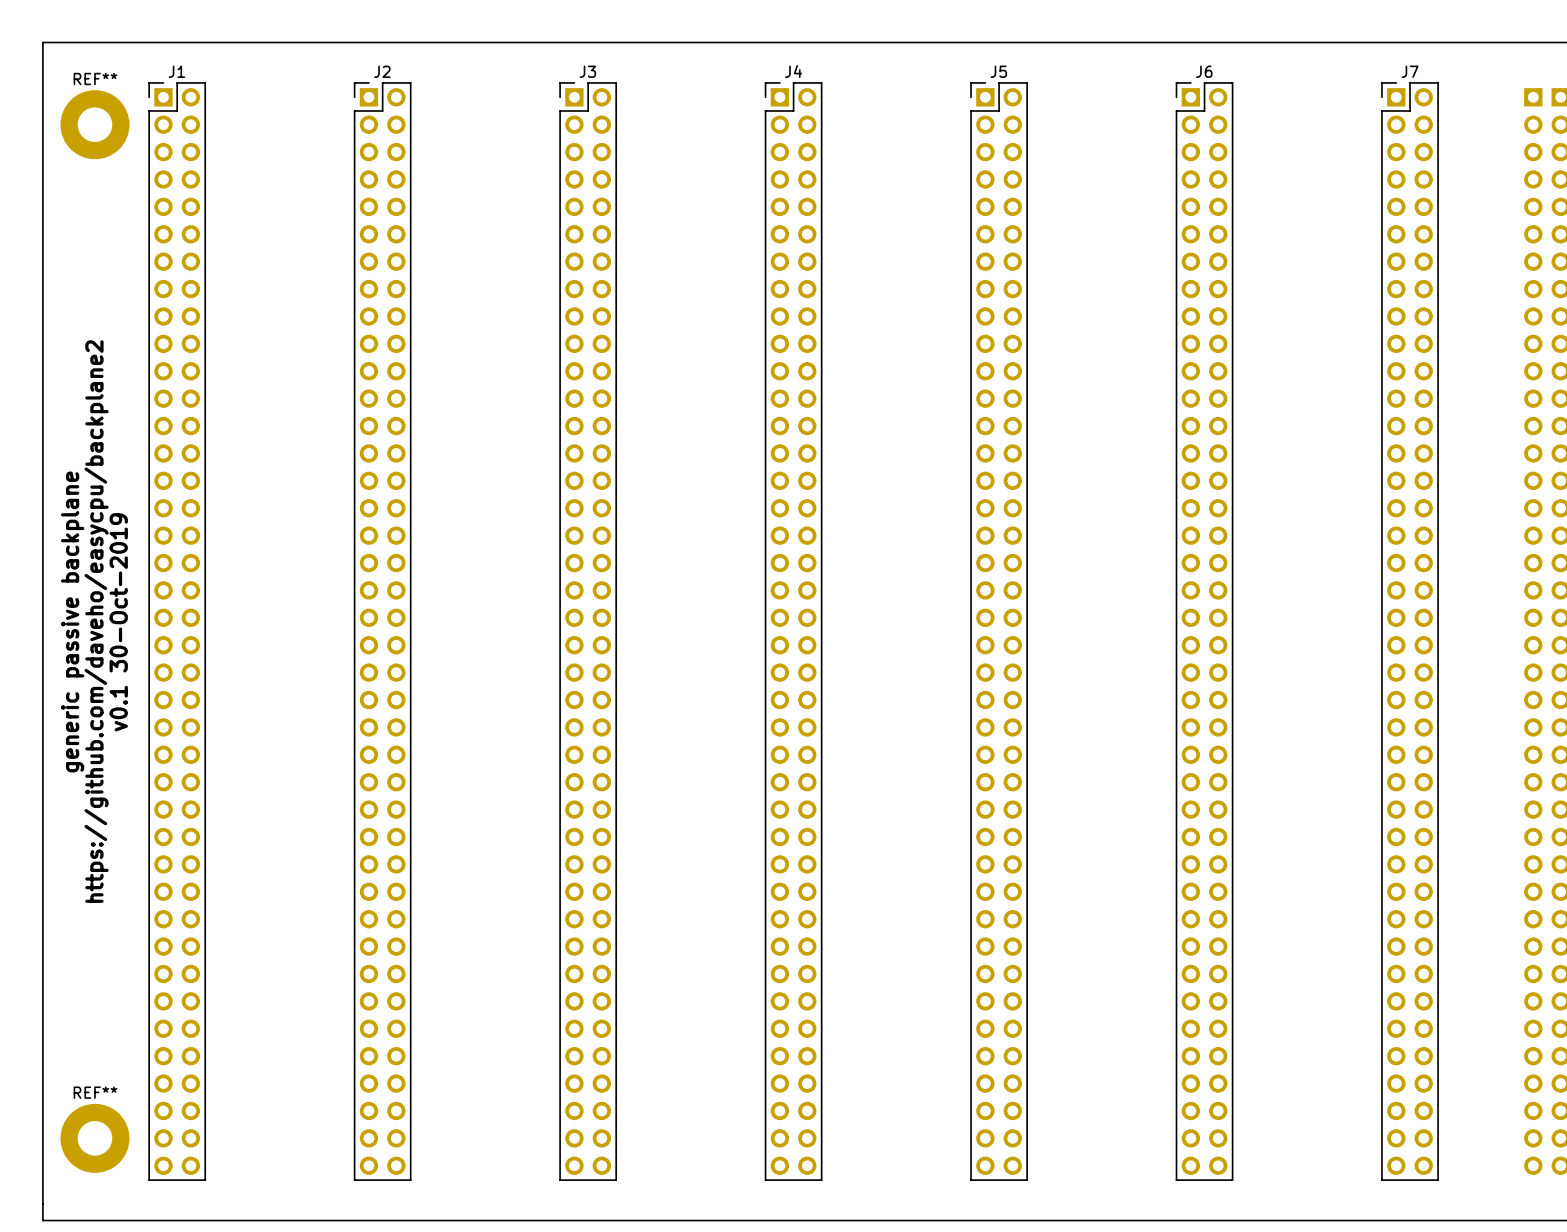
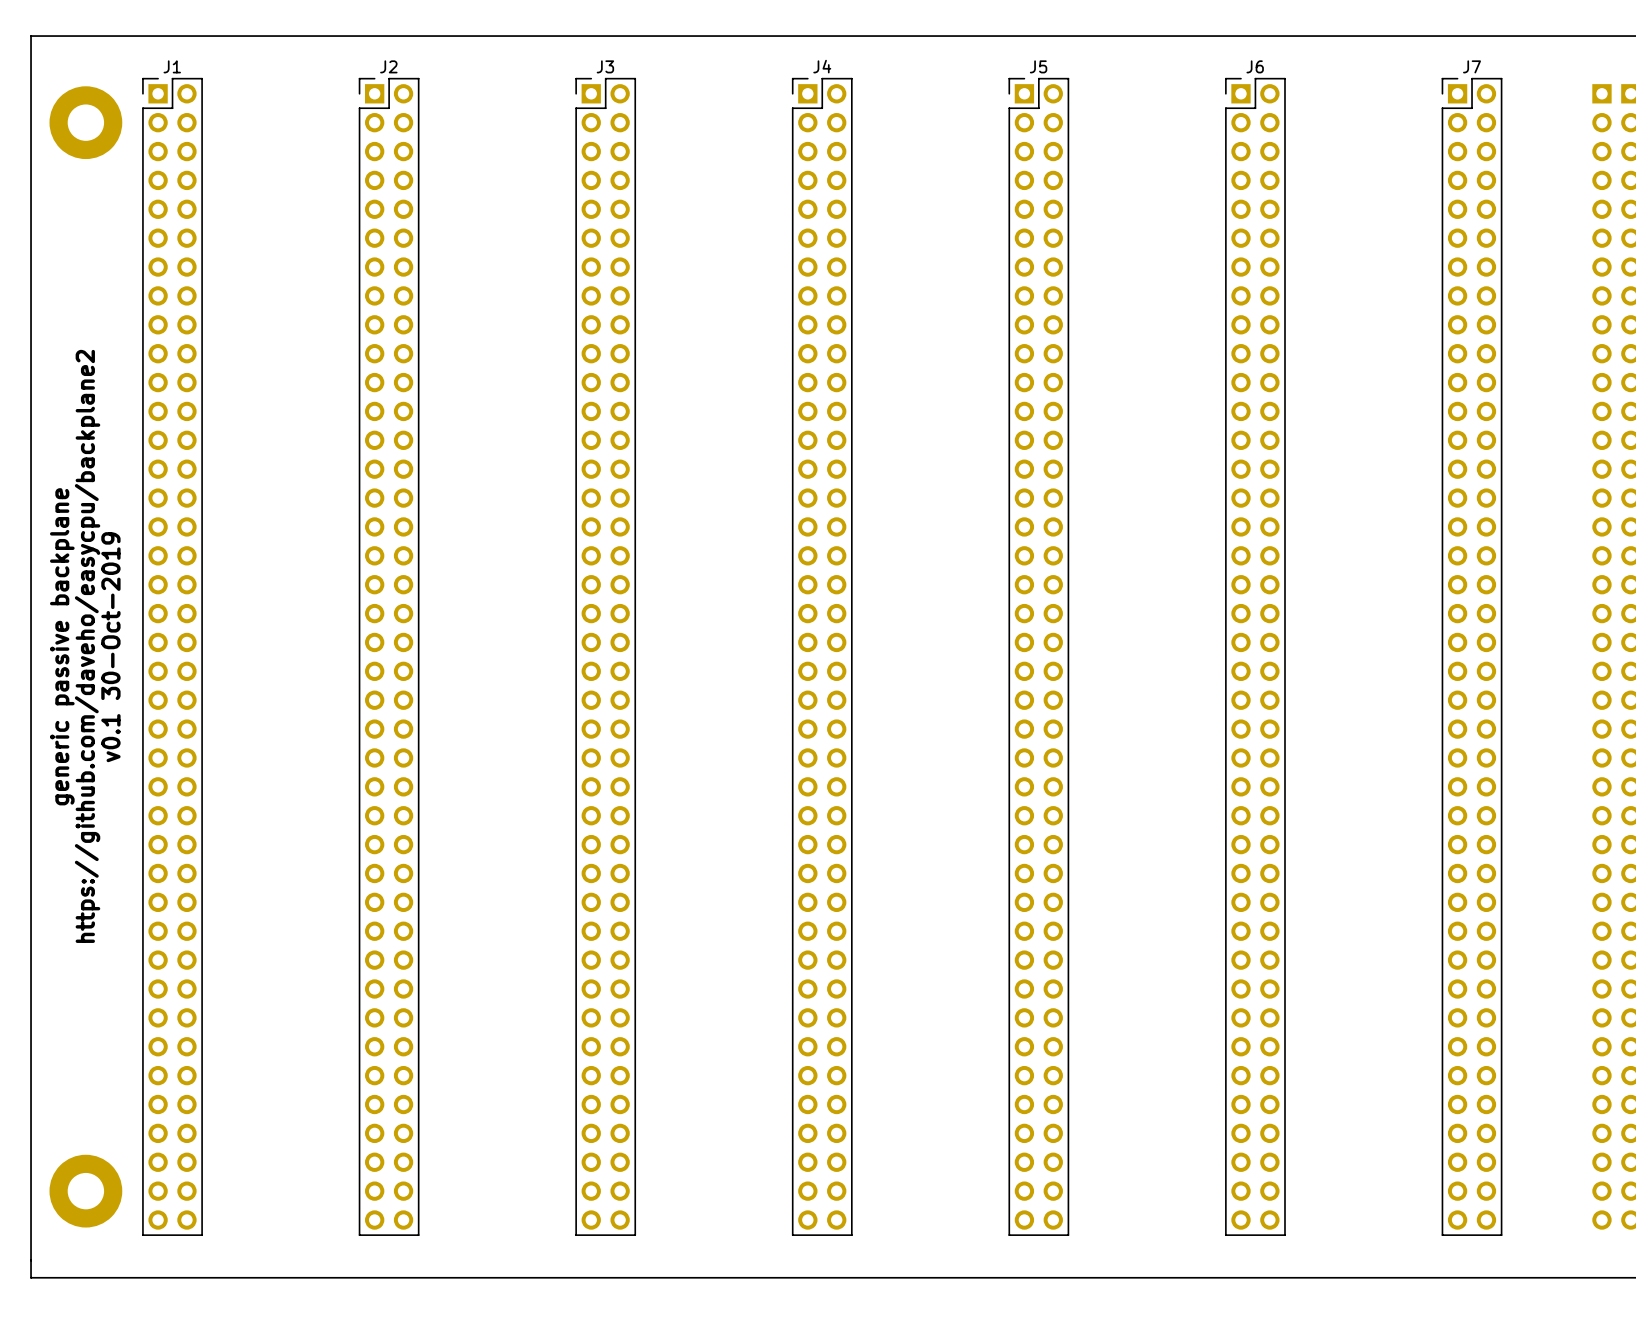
REF** name: REF** (95, 78) -> none
REF** name: REF** (95, 1092) -> none

